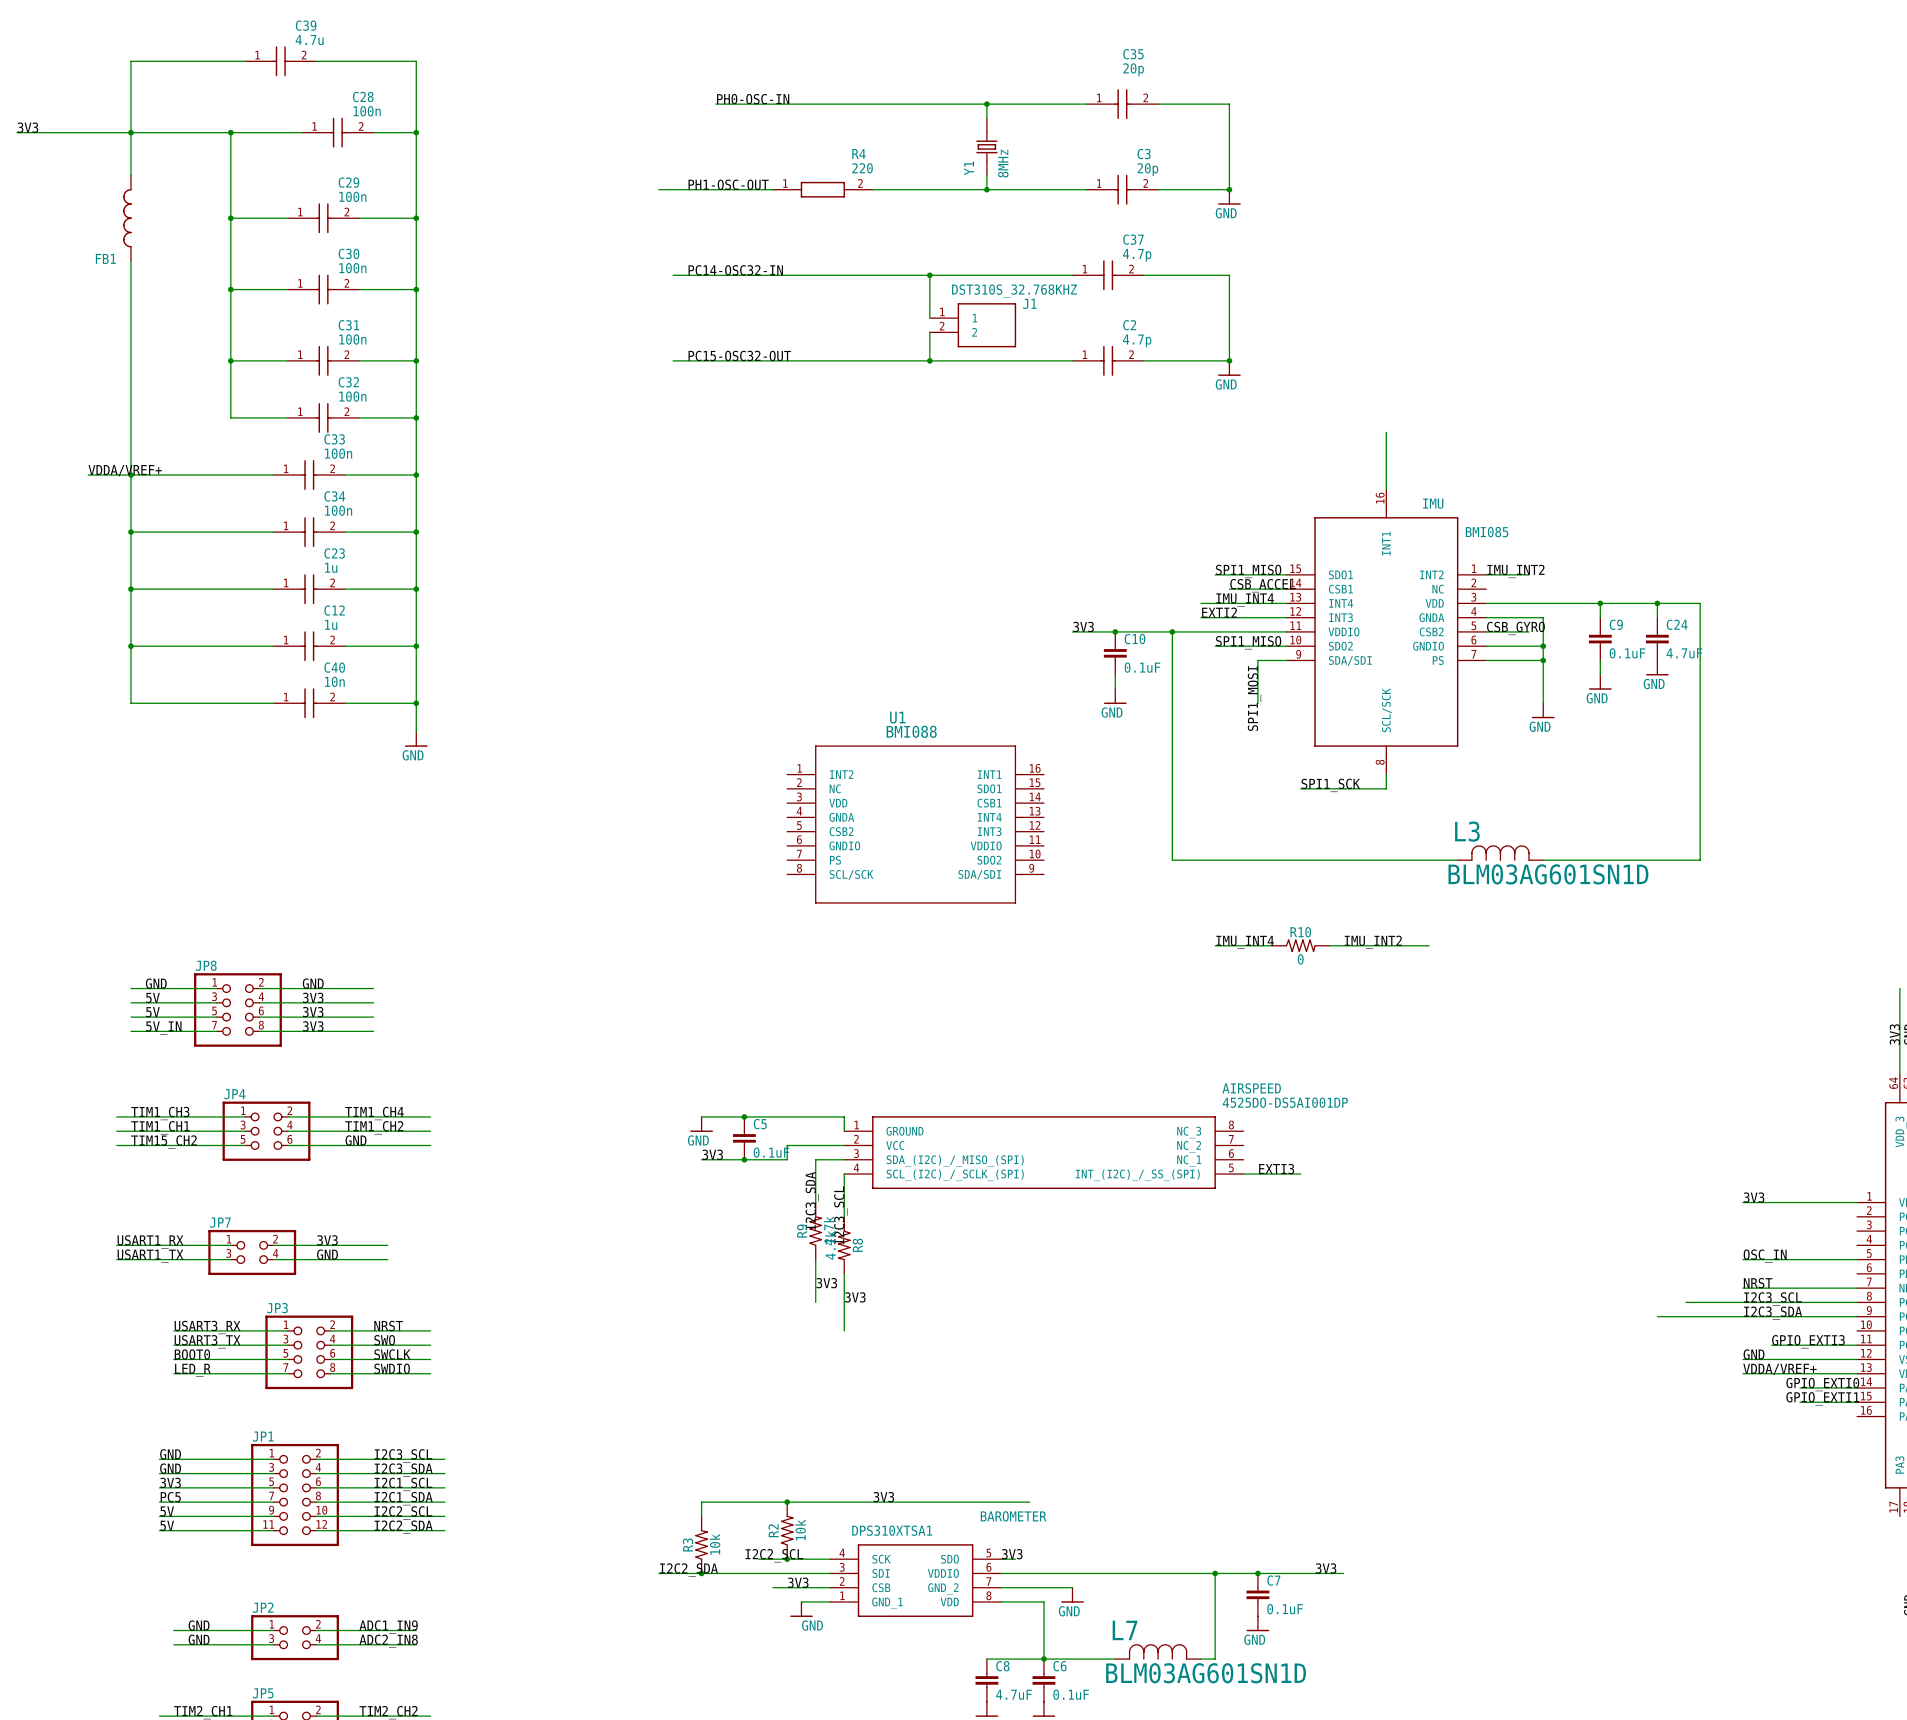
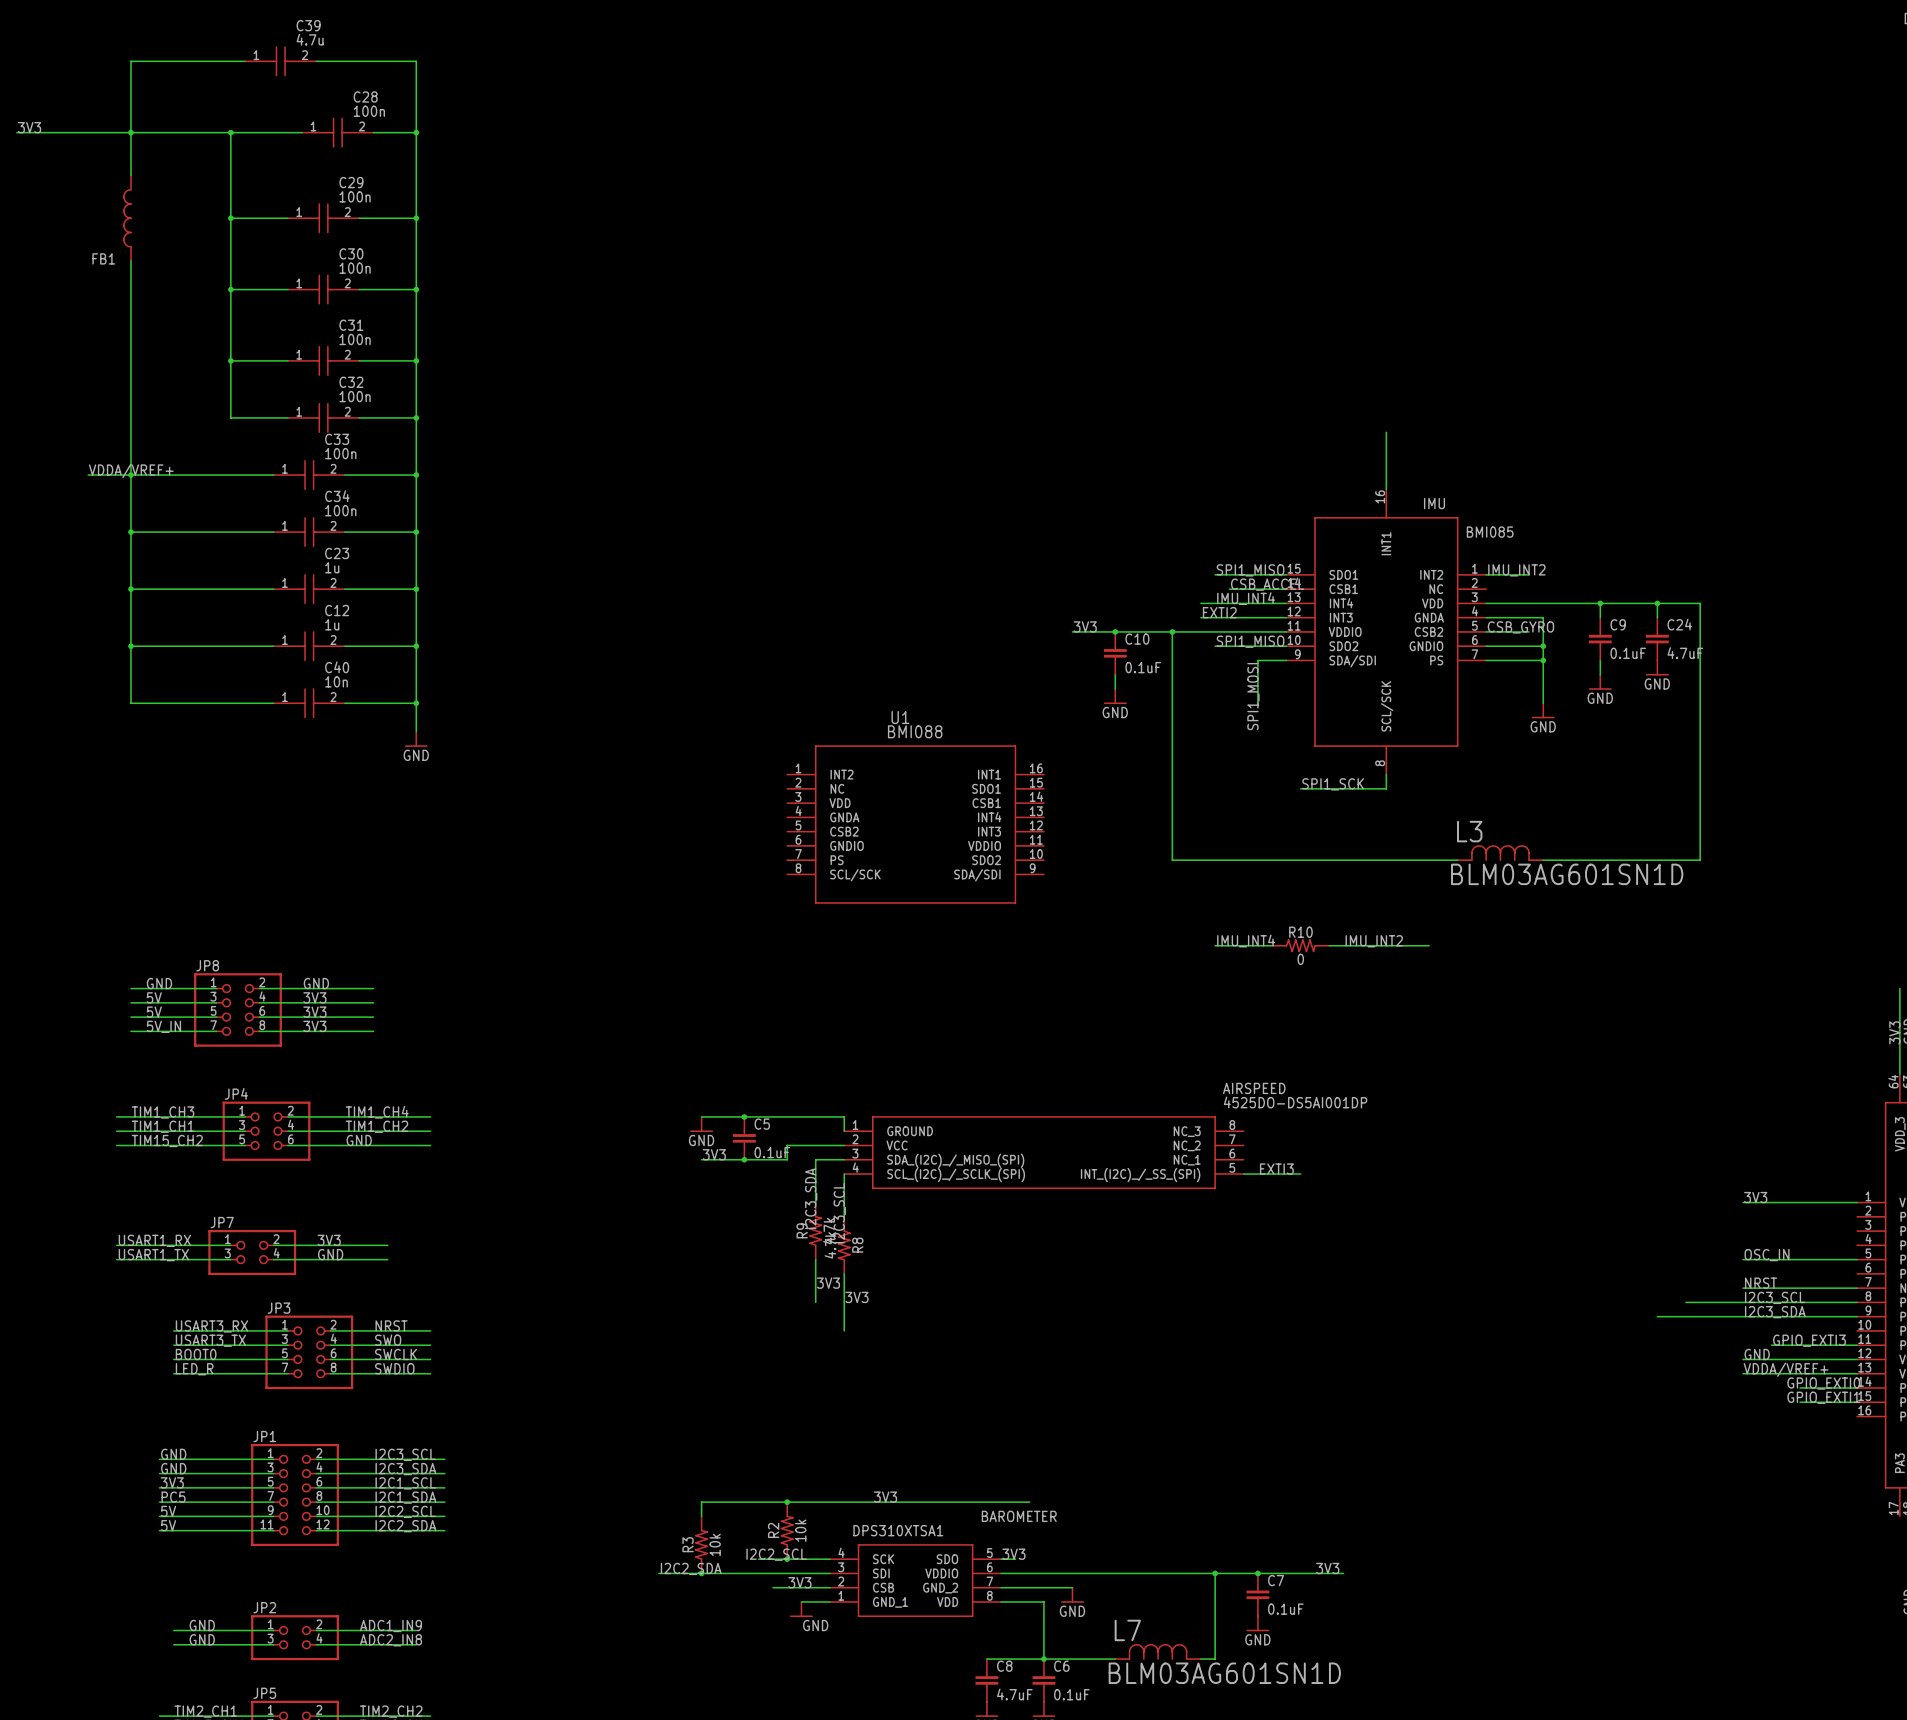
label: PH0-OSC-IN (753, 99) -> none
wire: (715, 104) (1086, 104) -> none
wire: (986, 104) (986, 118) -> none
junction: (986, 104) -> none
C35: 20p (1122, 104) -> none
wire: (1158, 104) (1229, 104) (1229, 189) (1158, 189) -> none
Y1: 8MHz (986, 146) -> none
wire: (986, 175) (986, 189) -> none
label: PH1-OSC-OUT (728, 184) -> none
wire: (658, 189) (772, 189) -> none
R4: 220 (822, 189) -> none
wire: (872, 189) (1086, 189) -> none
junction: (986, 189) -> none
C3: 20p (1122, 189) -> none
junction: (1229, 189) -> none
power symbol: GND (1229, 197) -> none
label: PC14-OSC32-IN (735, 270) -> none
wire: (673, 275) (1072, 275) -> none
wire: (929, 275) (929, 318) -> none
junction: (929, 275) -> none
C37: 4.7p (1108, 275) -> none
wire: (1143, 275) (1229, 275) (1229, 360) (1143, 360) -> none
J1: DST310S_32.768KHZ (972, 325) -> none
wire: (929, 332) (929, 360) -> none
label: PC15-OSC32-OUT (739, 355) -> none
wire: (673, 360) (1072, 360) -> none
junction: (929, 360) -> none
C2: 4.7p (1108, 360) -> none
junction: (1229, 360) -> none
power symbol: GND (1229, 368) -> none

